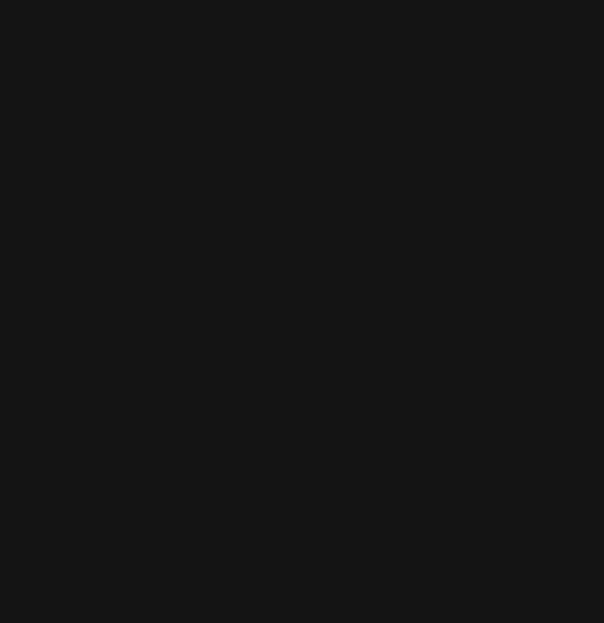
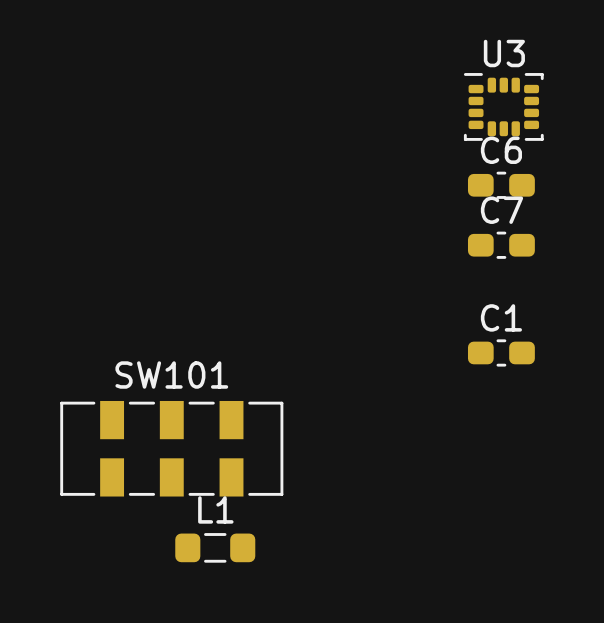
U3: none -> (503, 106)
C6: none -> (501, 185)
C7: none -> (501, 245)
C1: none -> (501, 352)
SW101: none -> (171, 448)
L1: none -> (215, 547)

